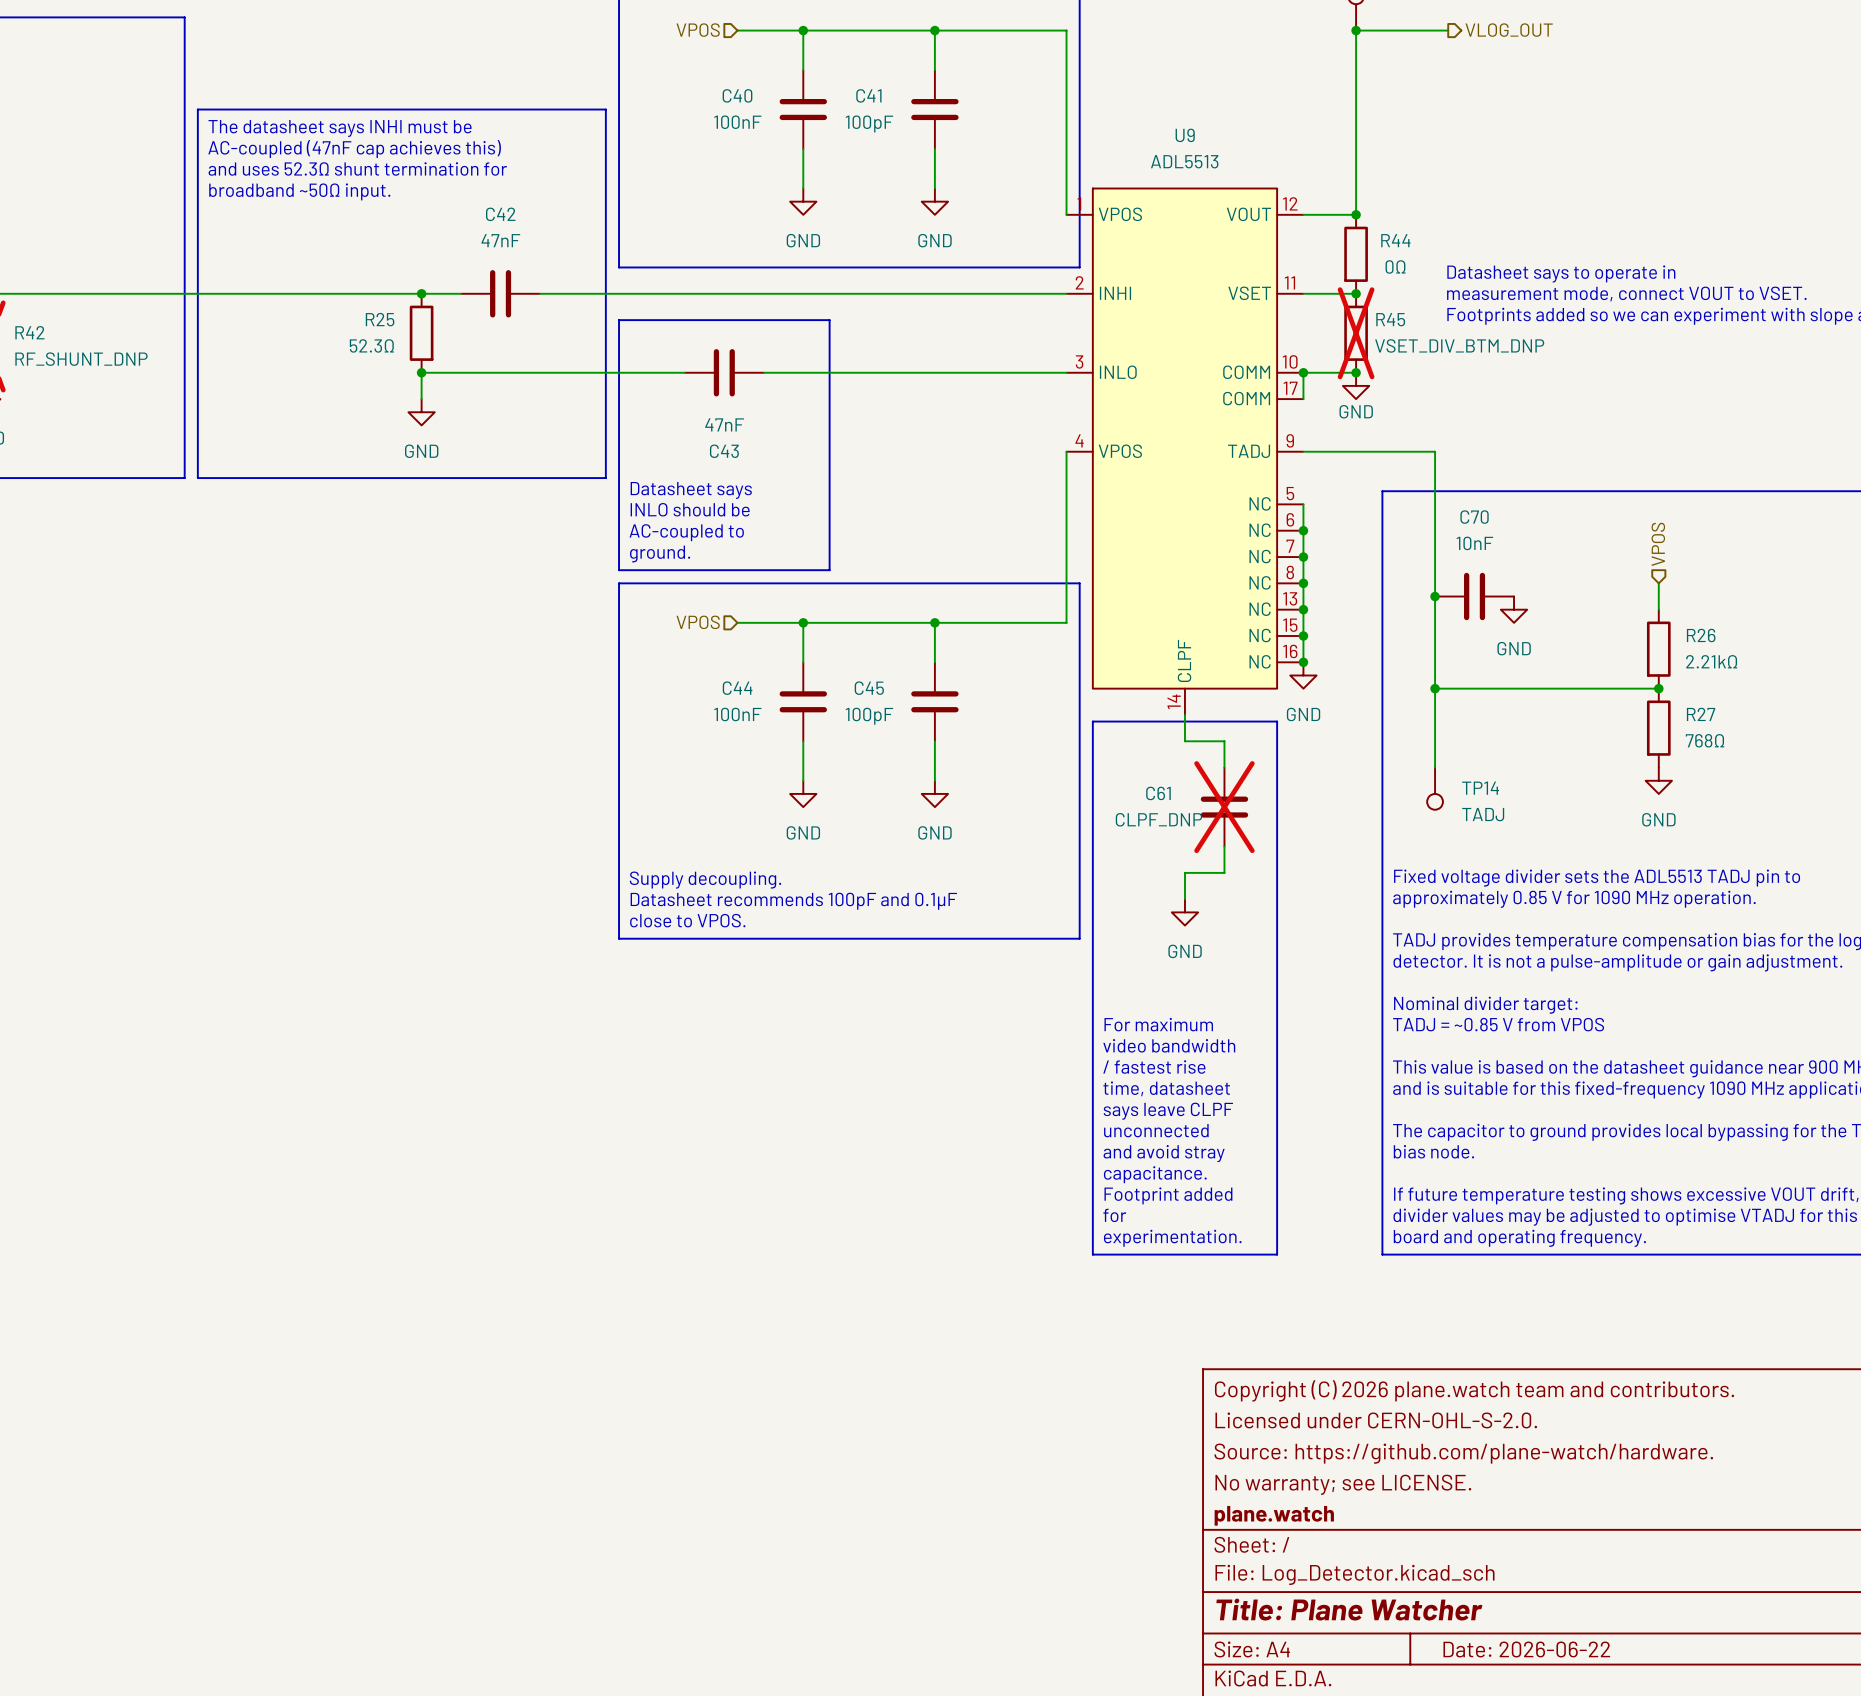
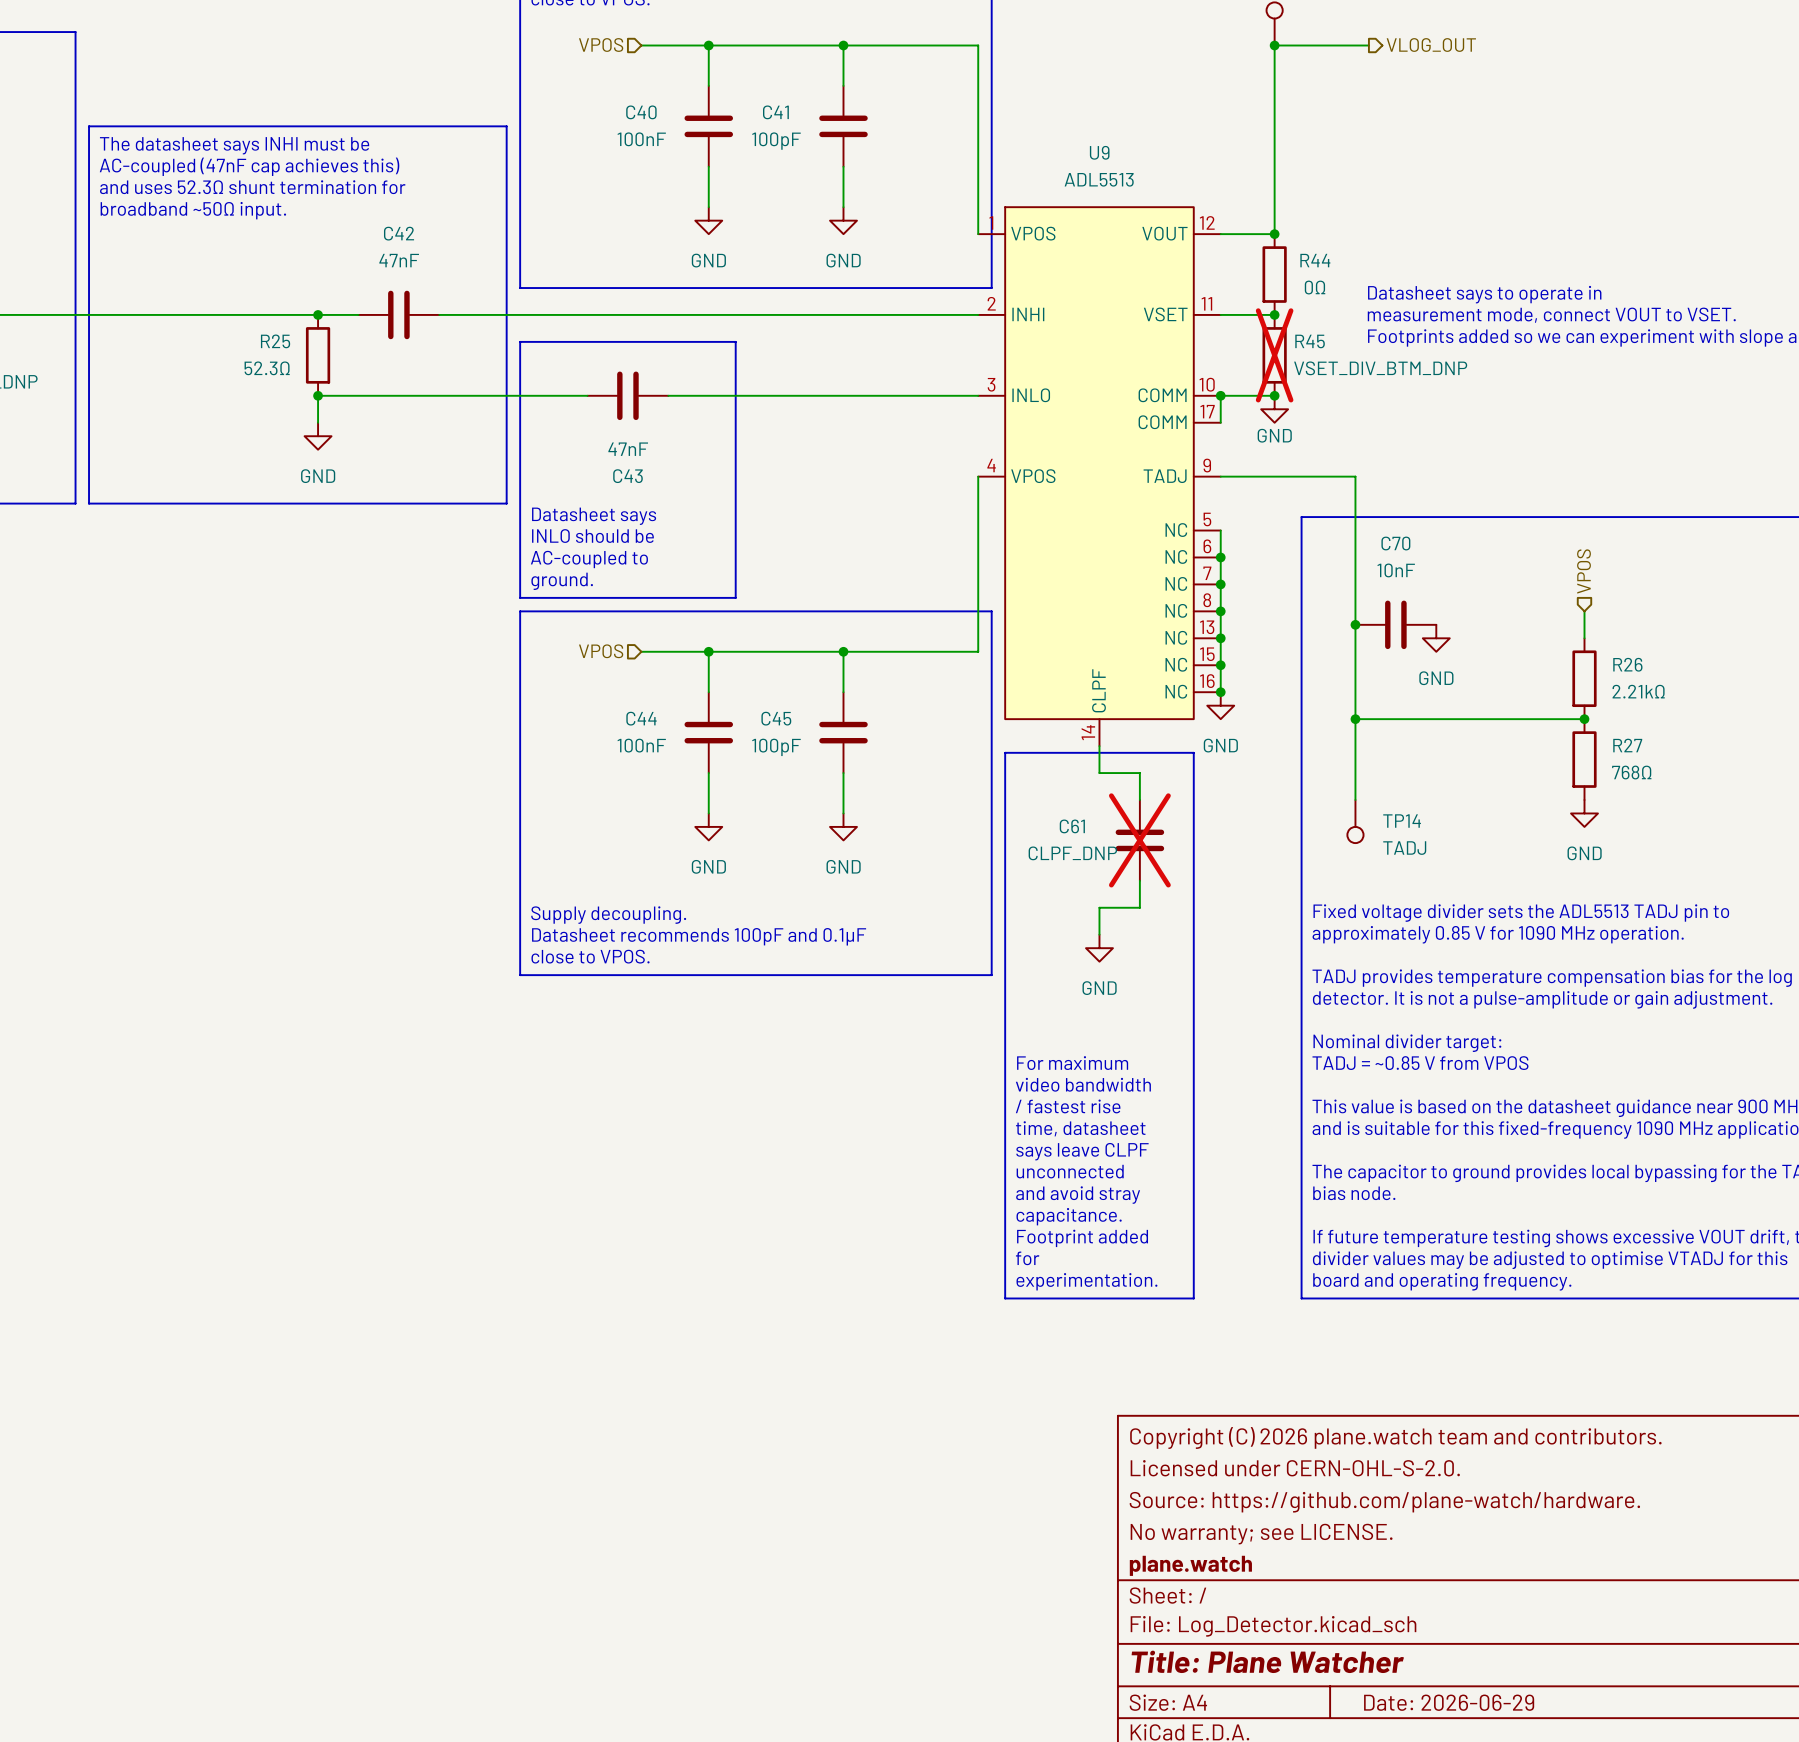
title block: Date: 2026-06-22 (1526, 1649) -> Date: 2026-06-29 (1449, 1702)

